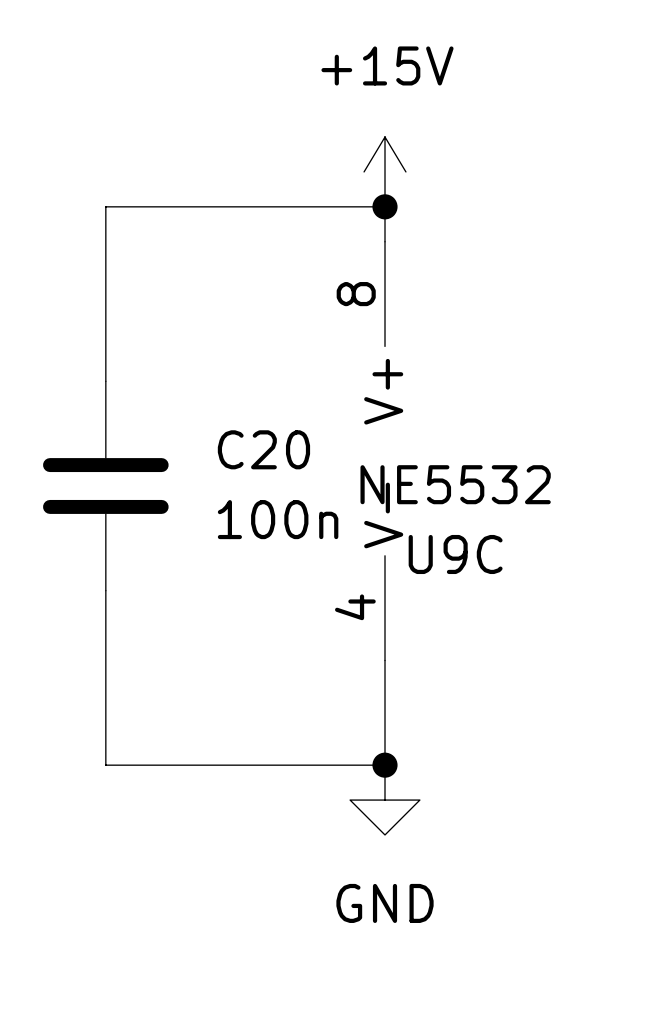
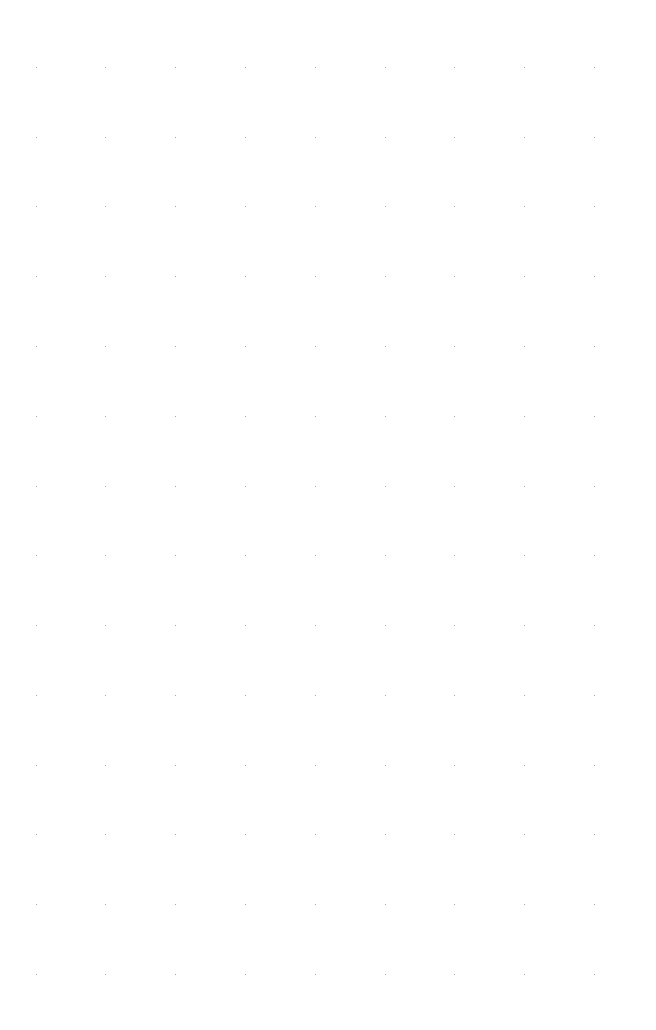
power symbol: +15V (385, 171) -> none
junction: (385, 206) -> none
wire: (385, 241) (385, 206) (105, 206) (105, 381) -> none
U9C: NE5532 (385, 451) -> none
C20: 100n (105, 486) -> none
wire: (105, 590) (105, 765) (385, 765) (385, 660) -> none
junction: (385, 765) -> none
power symbol: GND (385, 800) -> none

